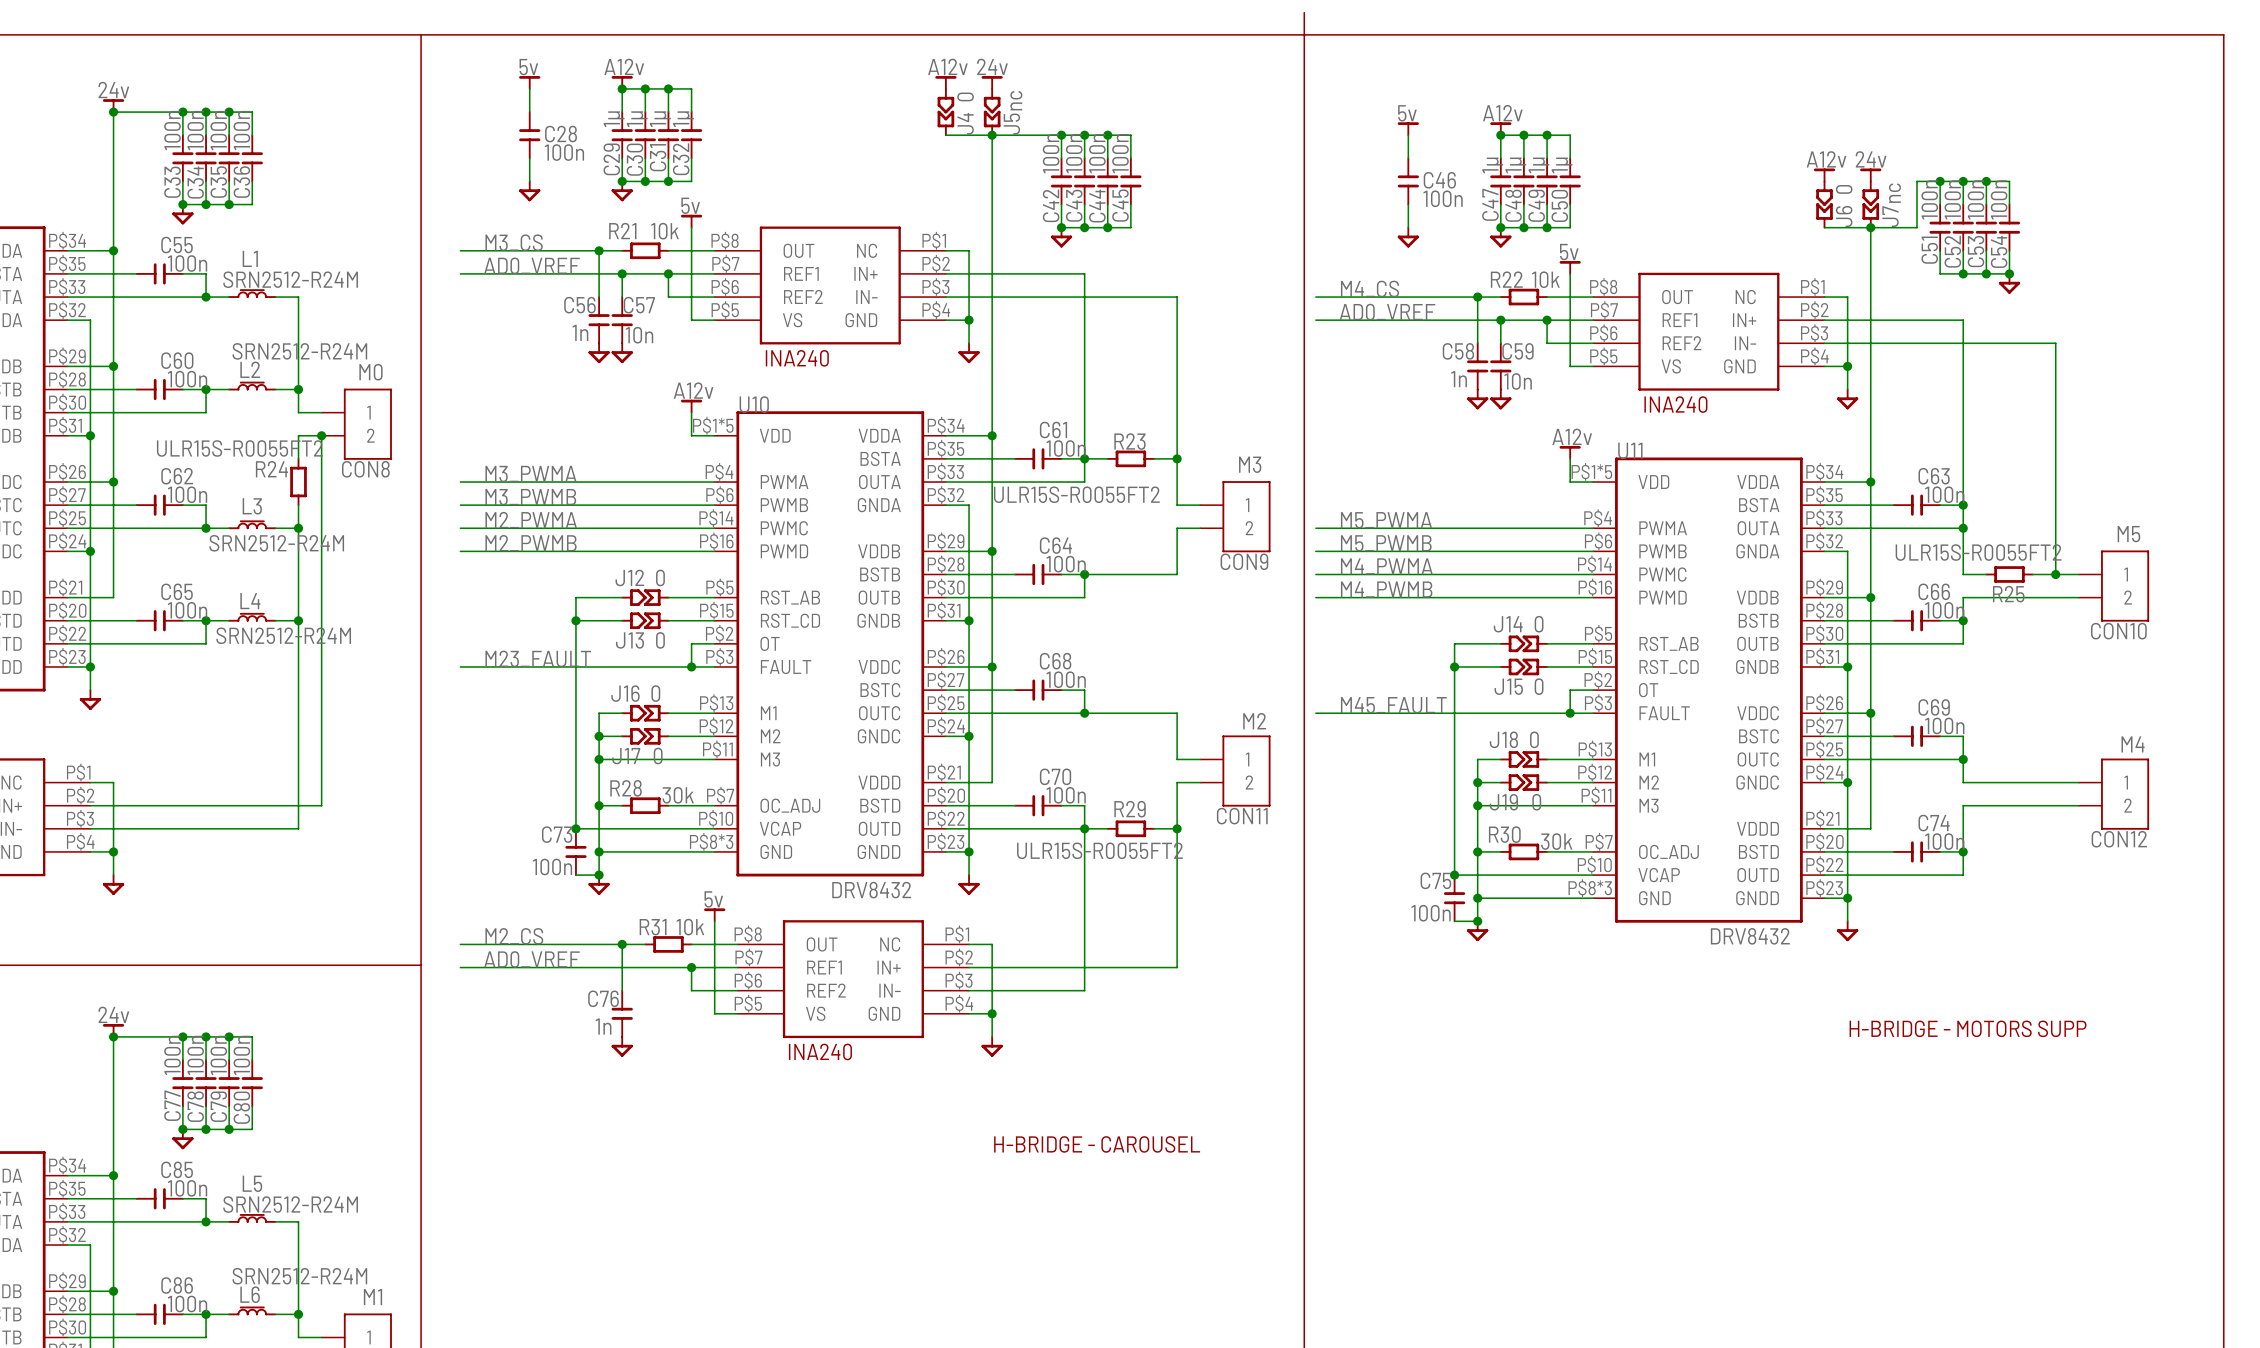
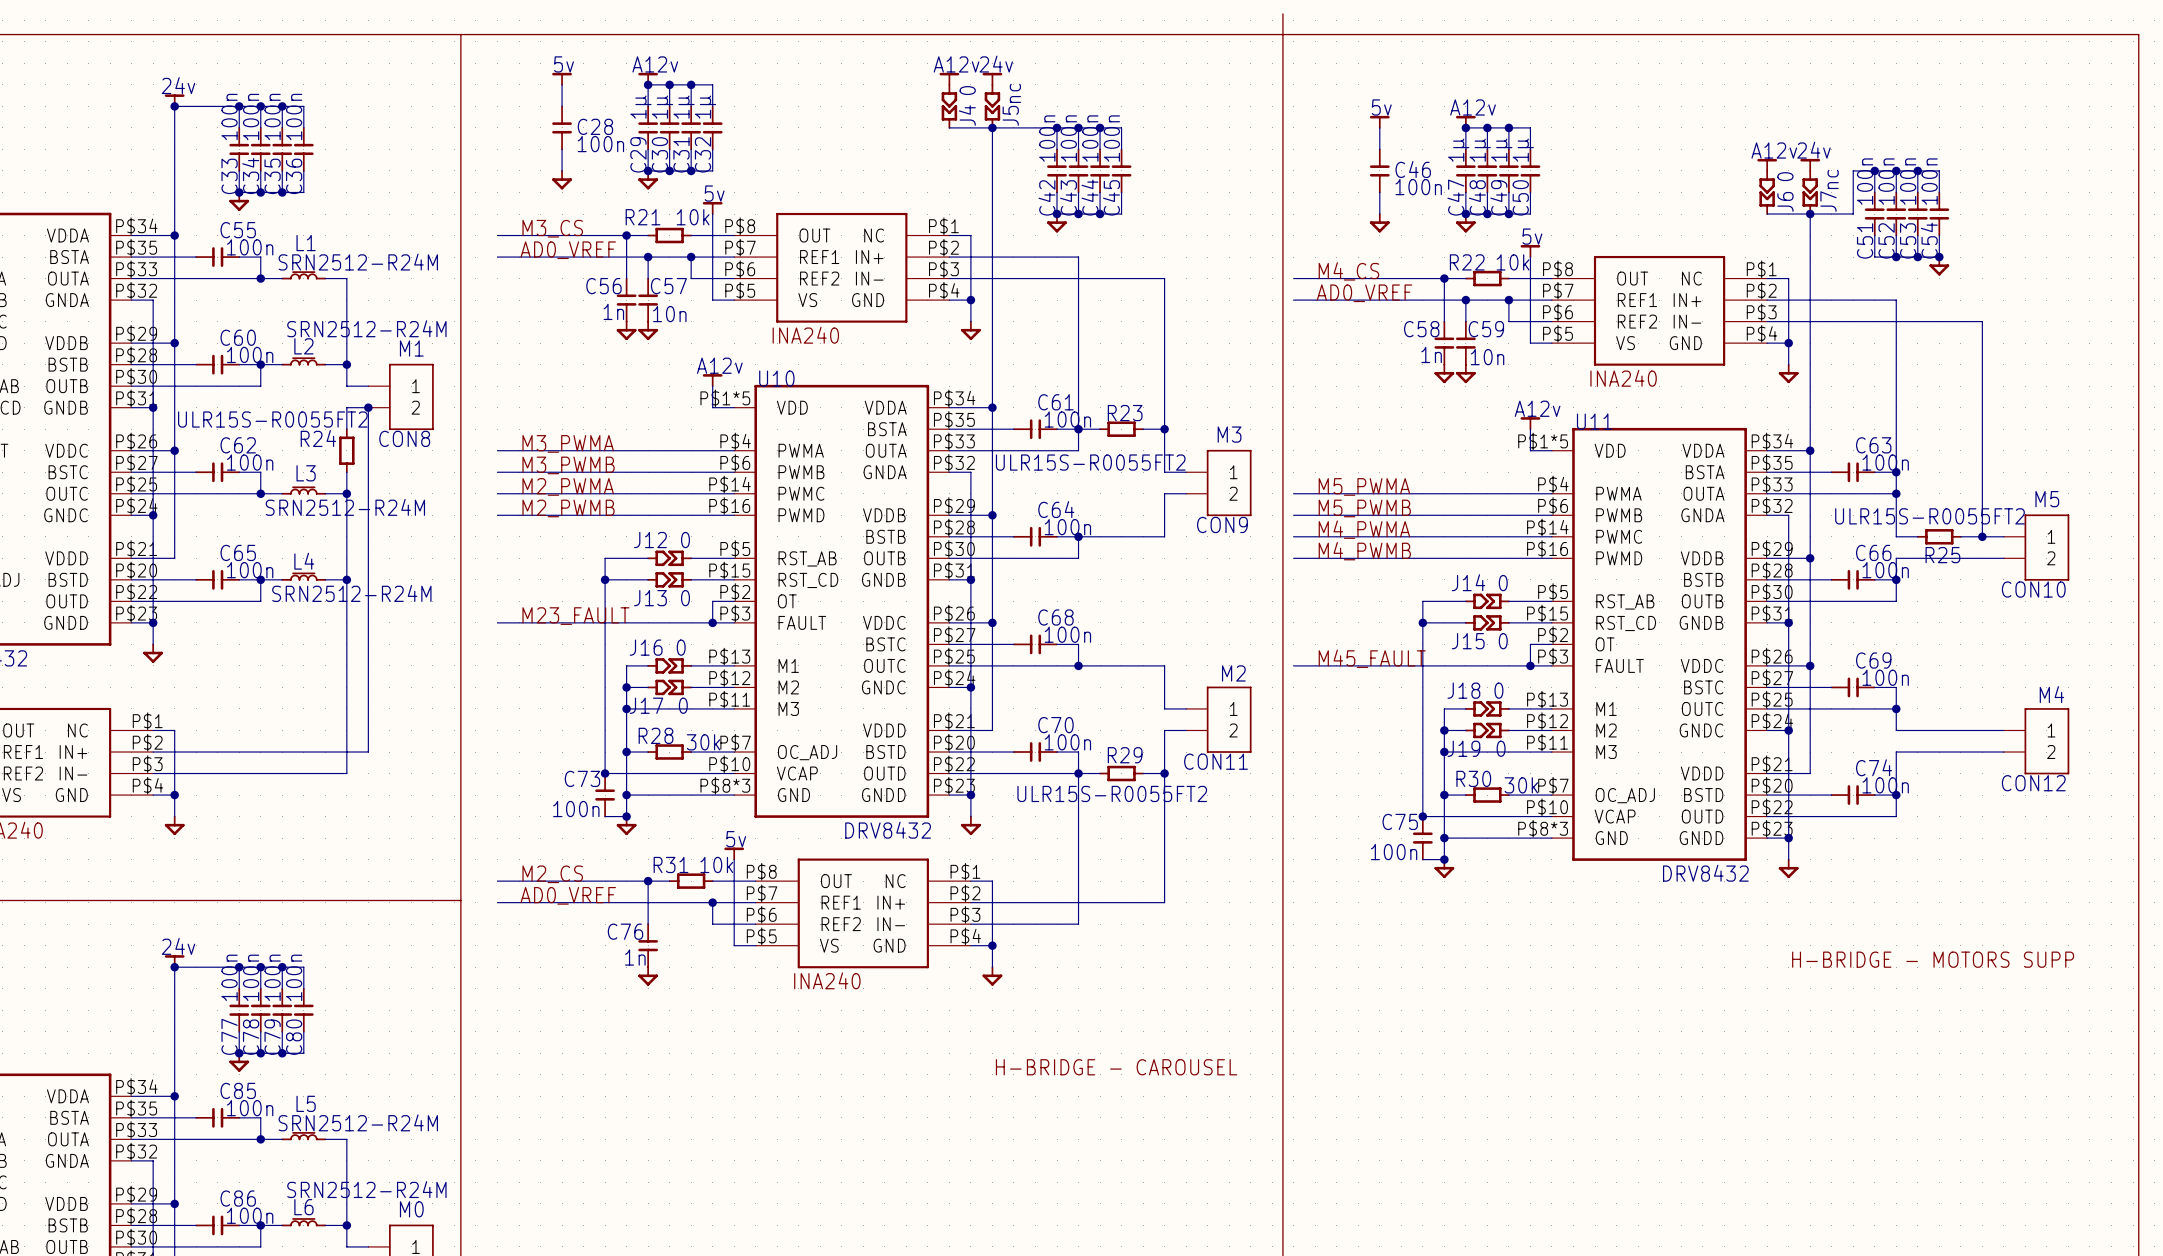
CON8 value: M0 (370, 372) -> M1 (411, 348)
part value: M1 (372, 1297) -> M0 (411, 1209)

